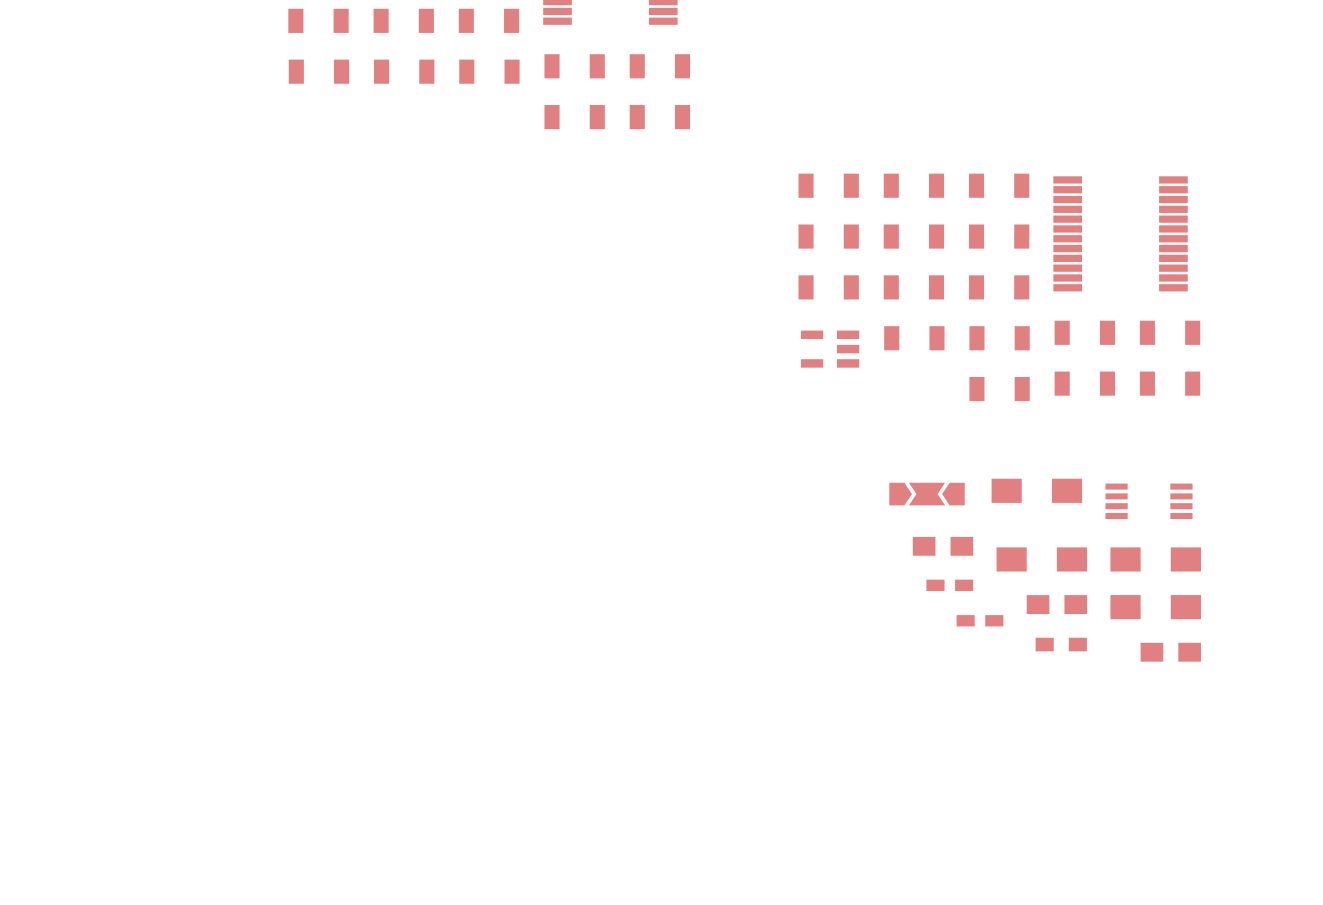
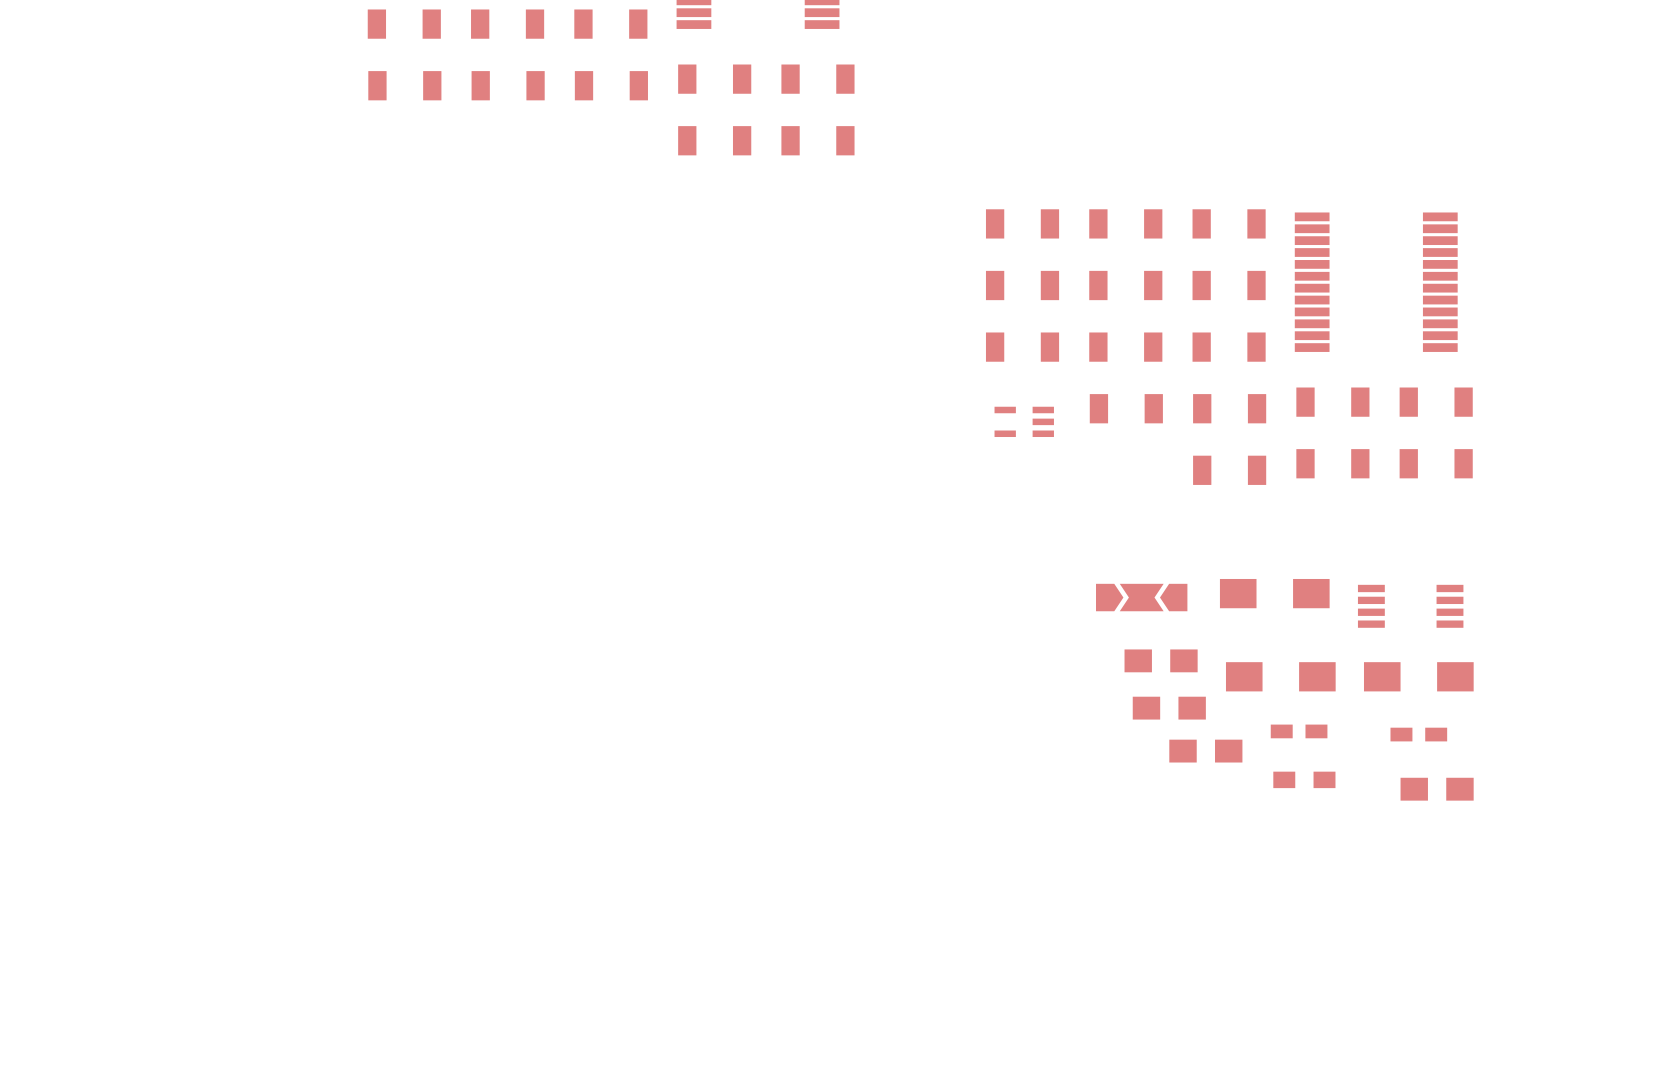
part footprint: [800, 330, 860, 368] -> [994, 406, 1054, 438]
part footprint: [926, 579, 974, 591] -> [1132, 696, 1206, 720]
part footprint: [1026, 595, 1088, 614] -> [1270, 724, 1328, 739]
part footprint: [1110, 595, 1201, 620] -> [1390, 727, 1448, 742]
part footprint: [956, 615, 1004, 627] -> [1169, 739, 1243, 763]

